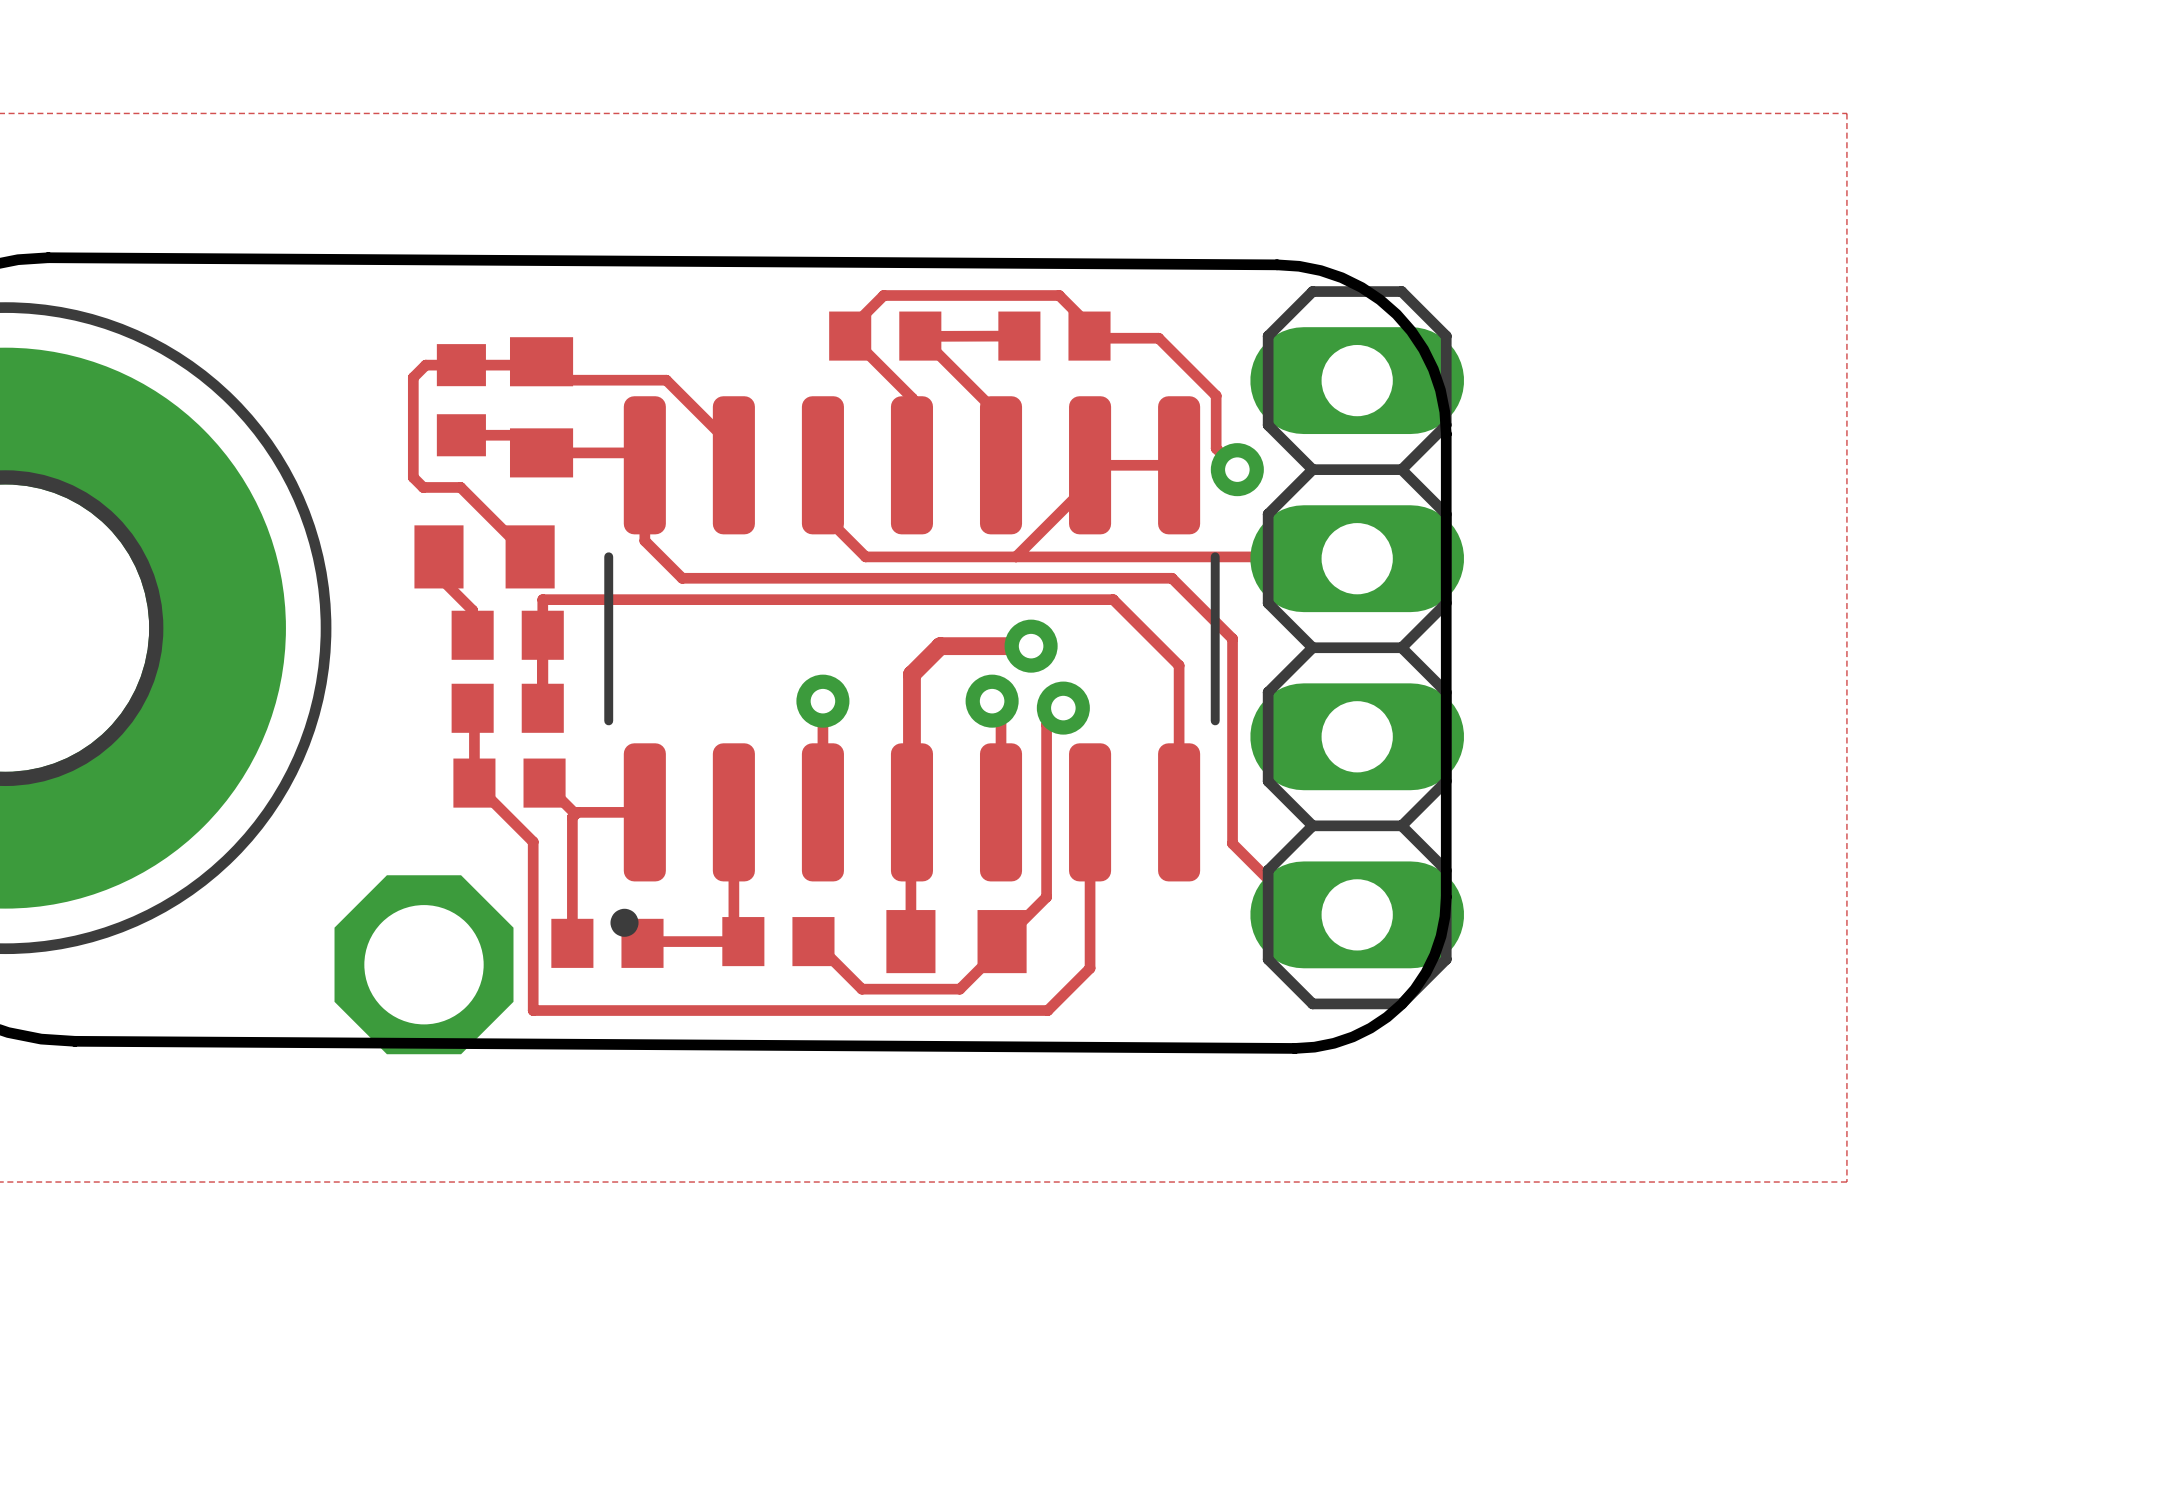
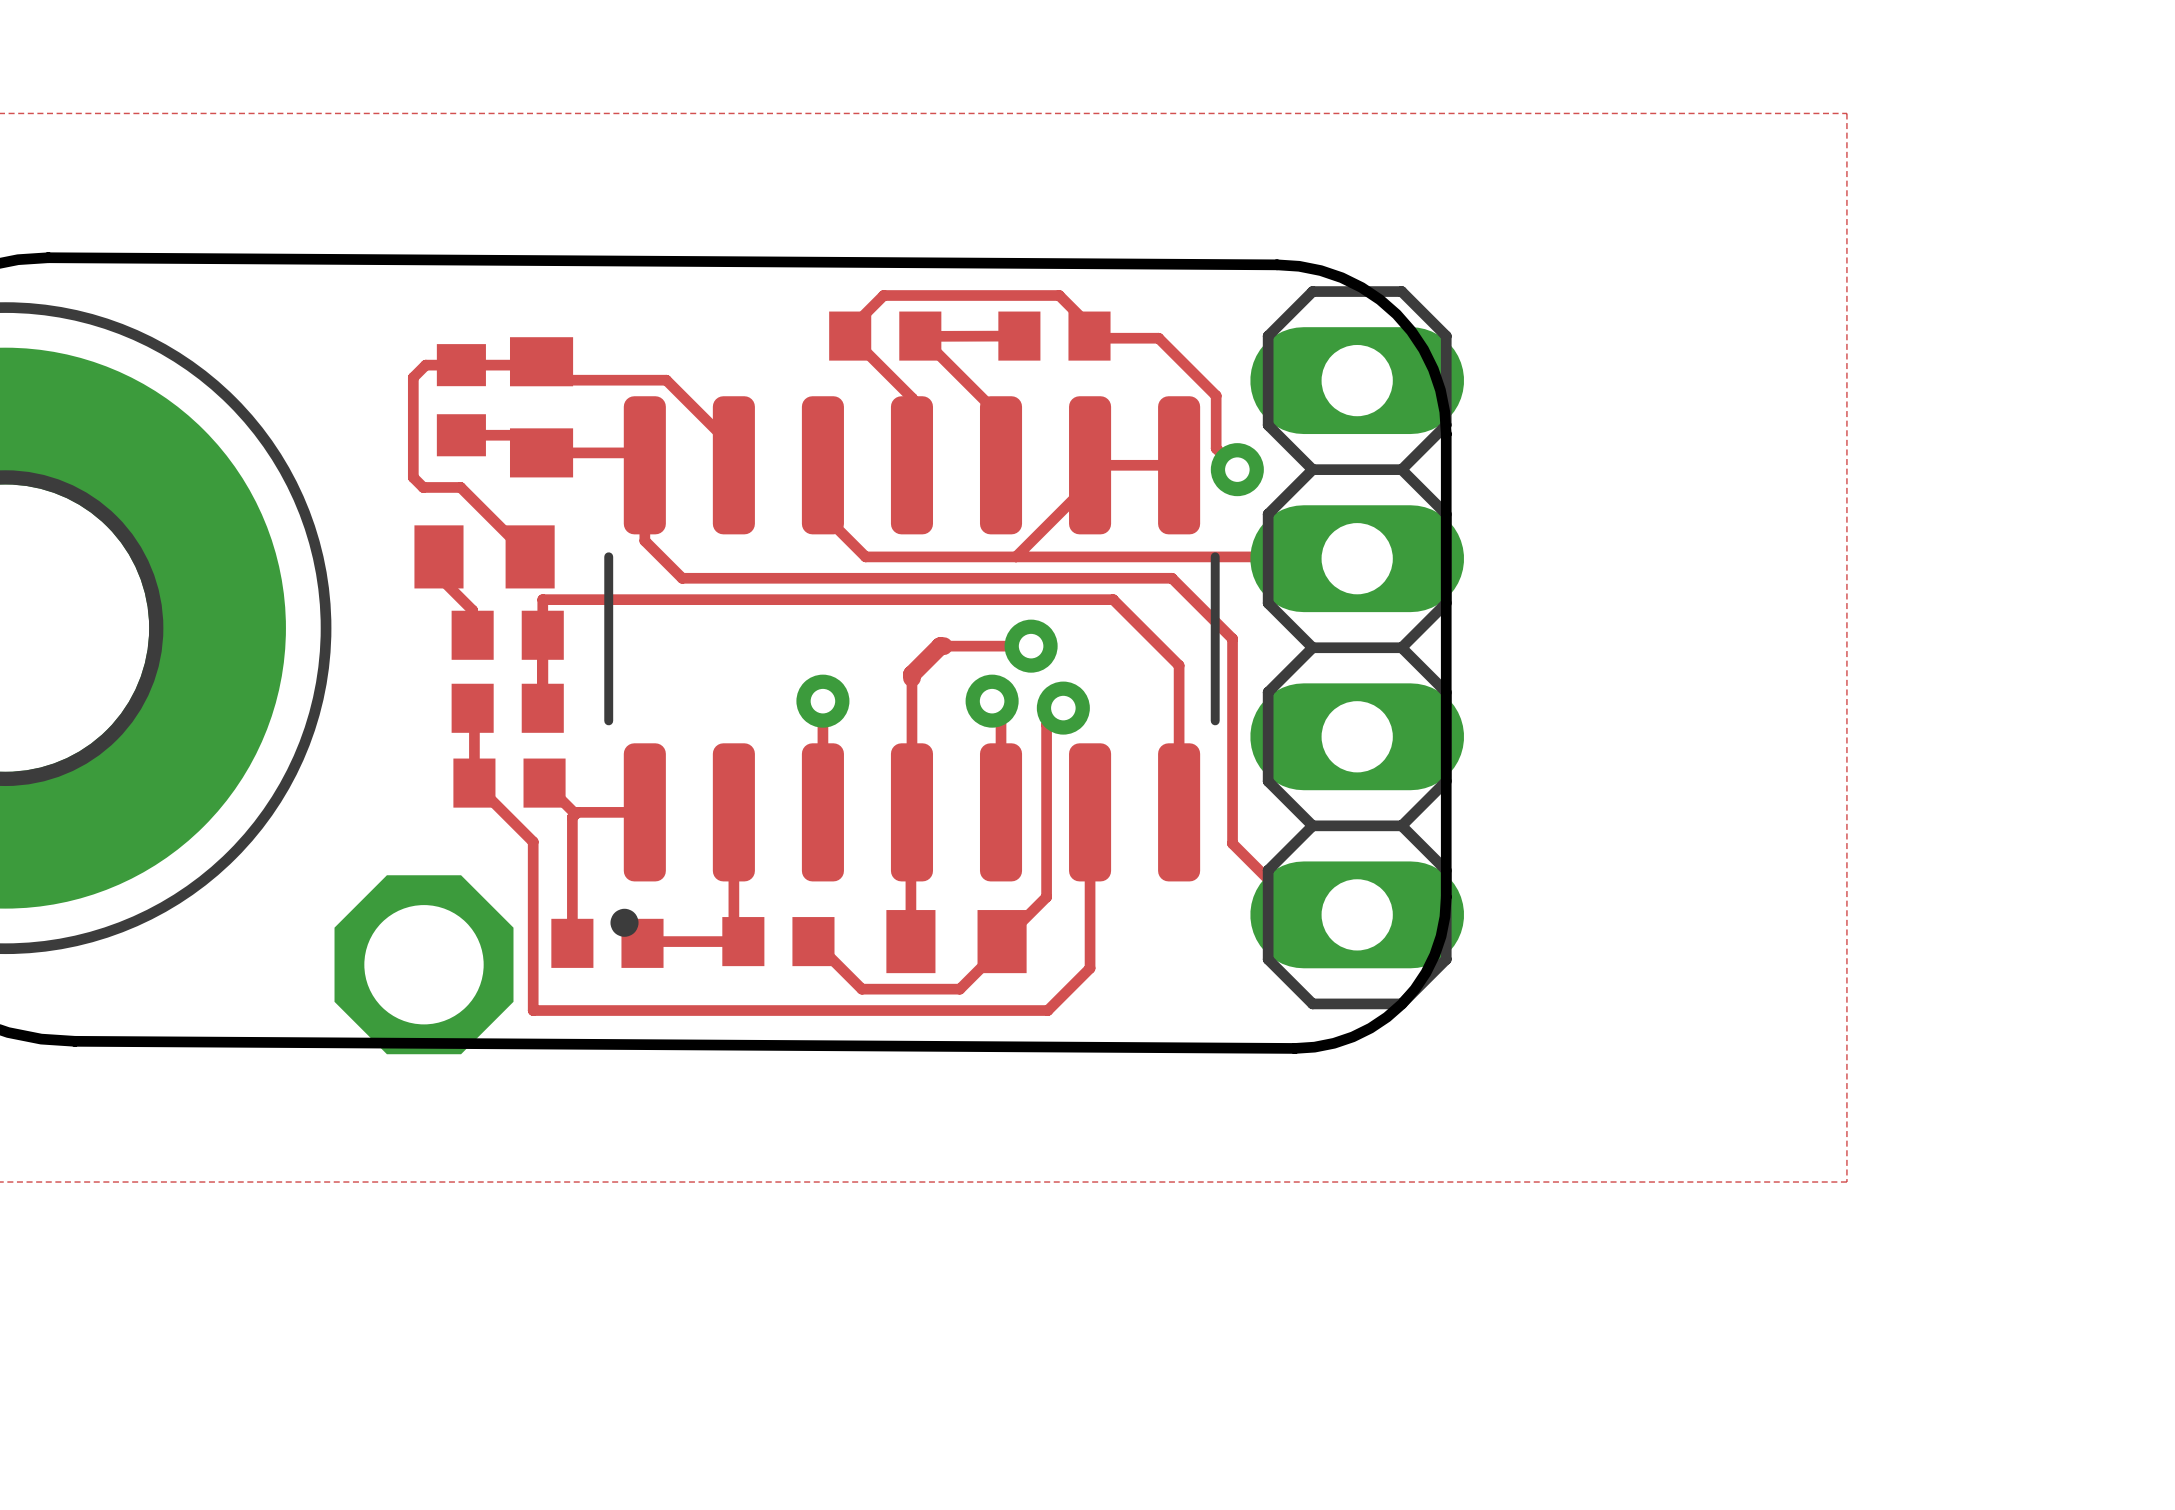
track width: thick (943, 646) (1031, 646) -> thin (943, 646) (1031, 646)
track width: thick (911, 678) (911, 812) -> thin (911, 678) (911, 812)

